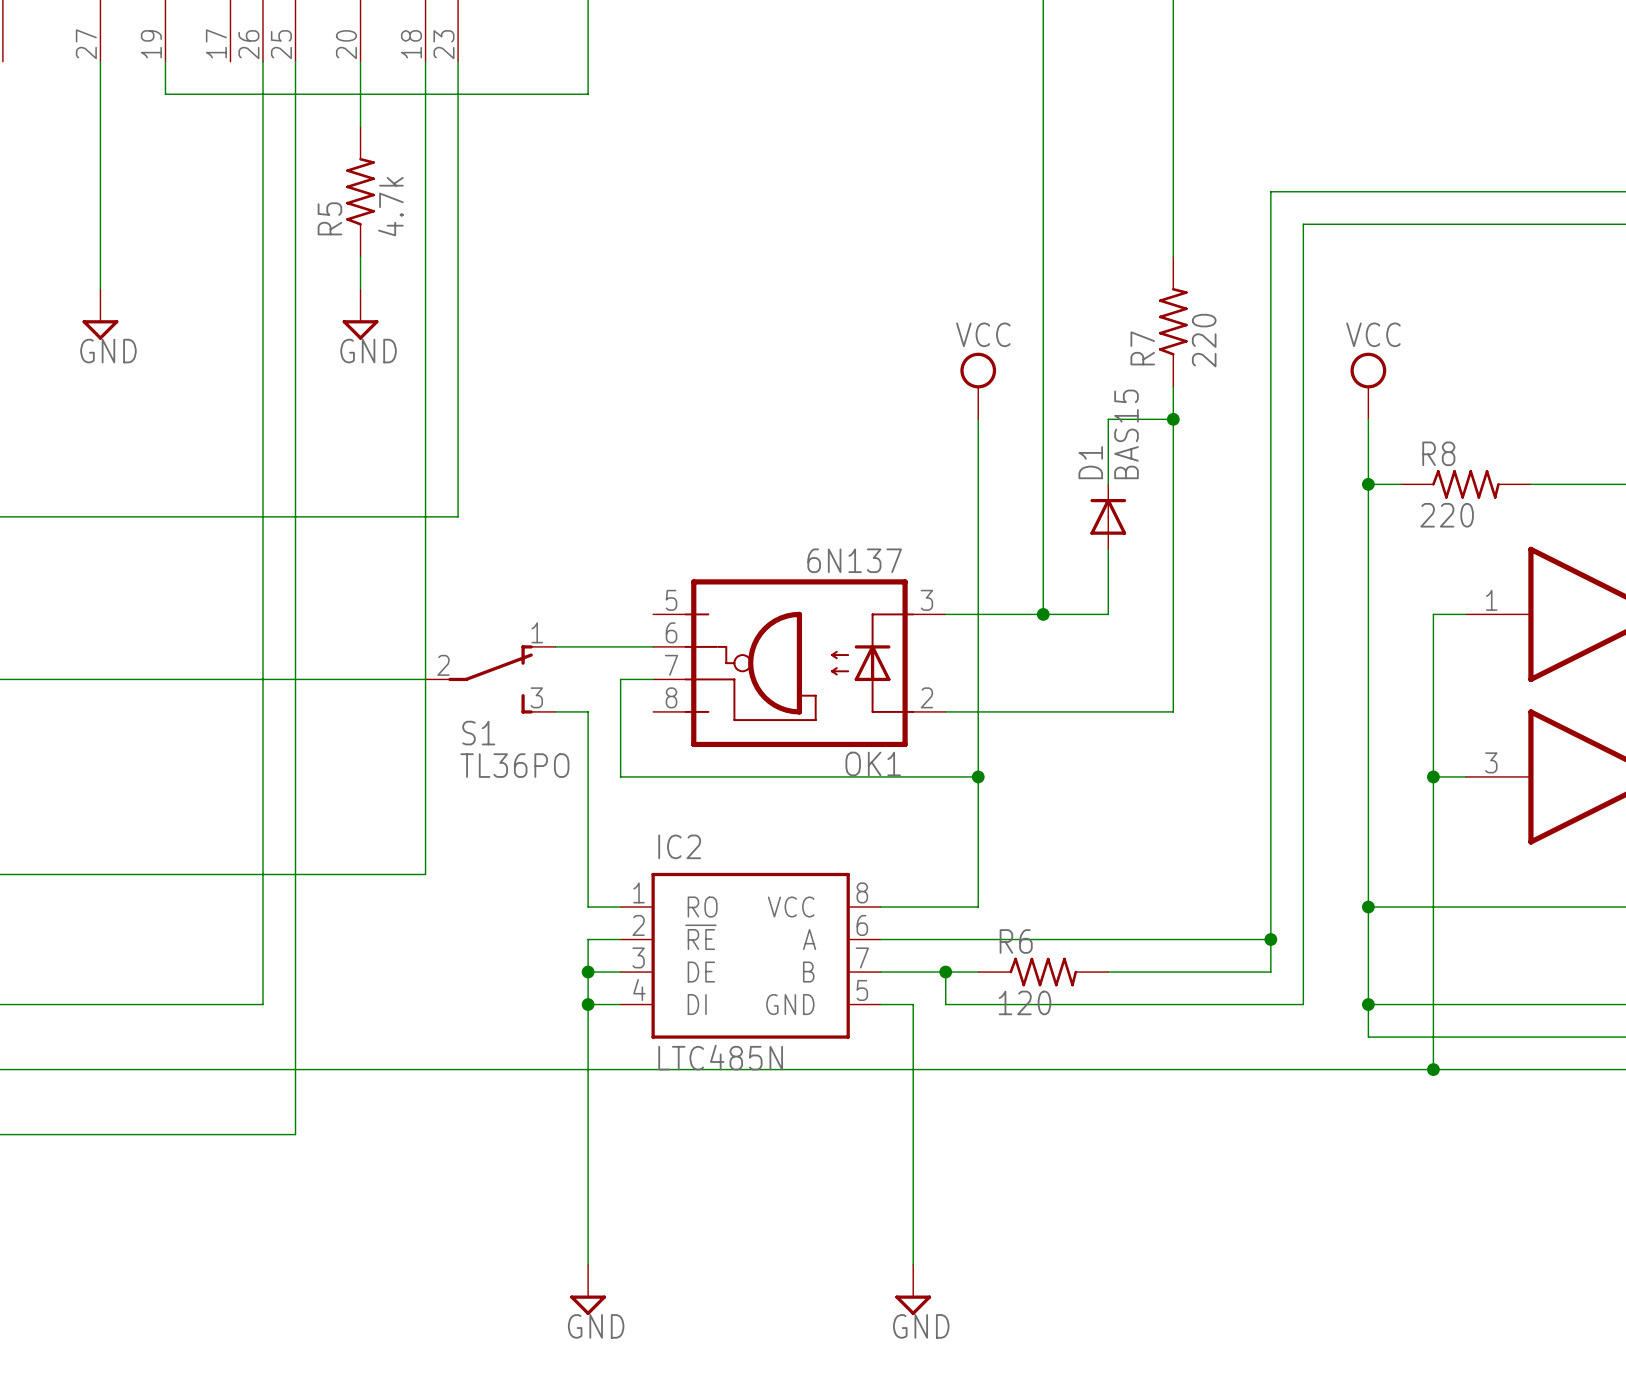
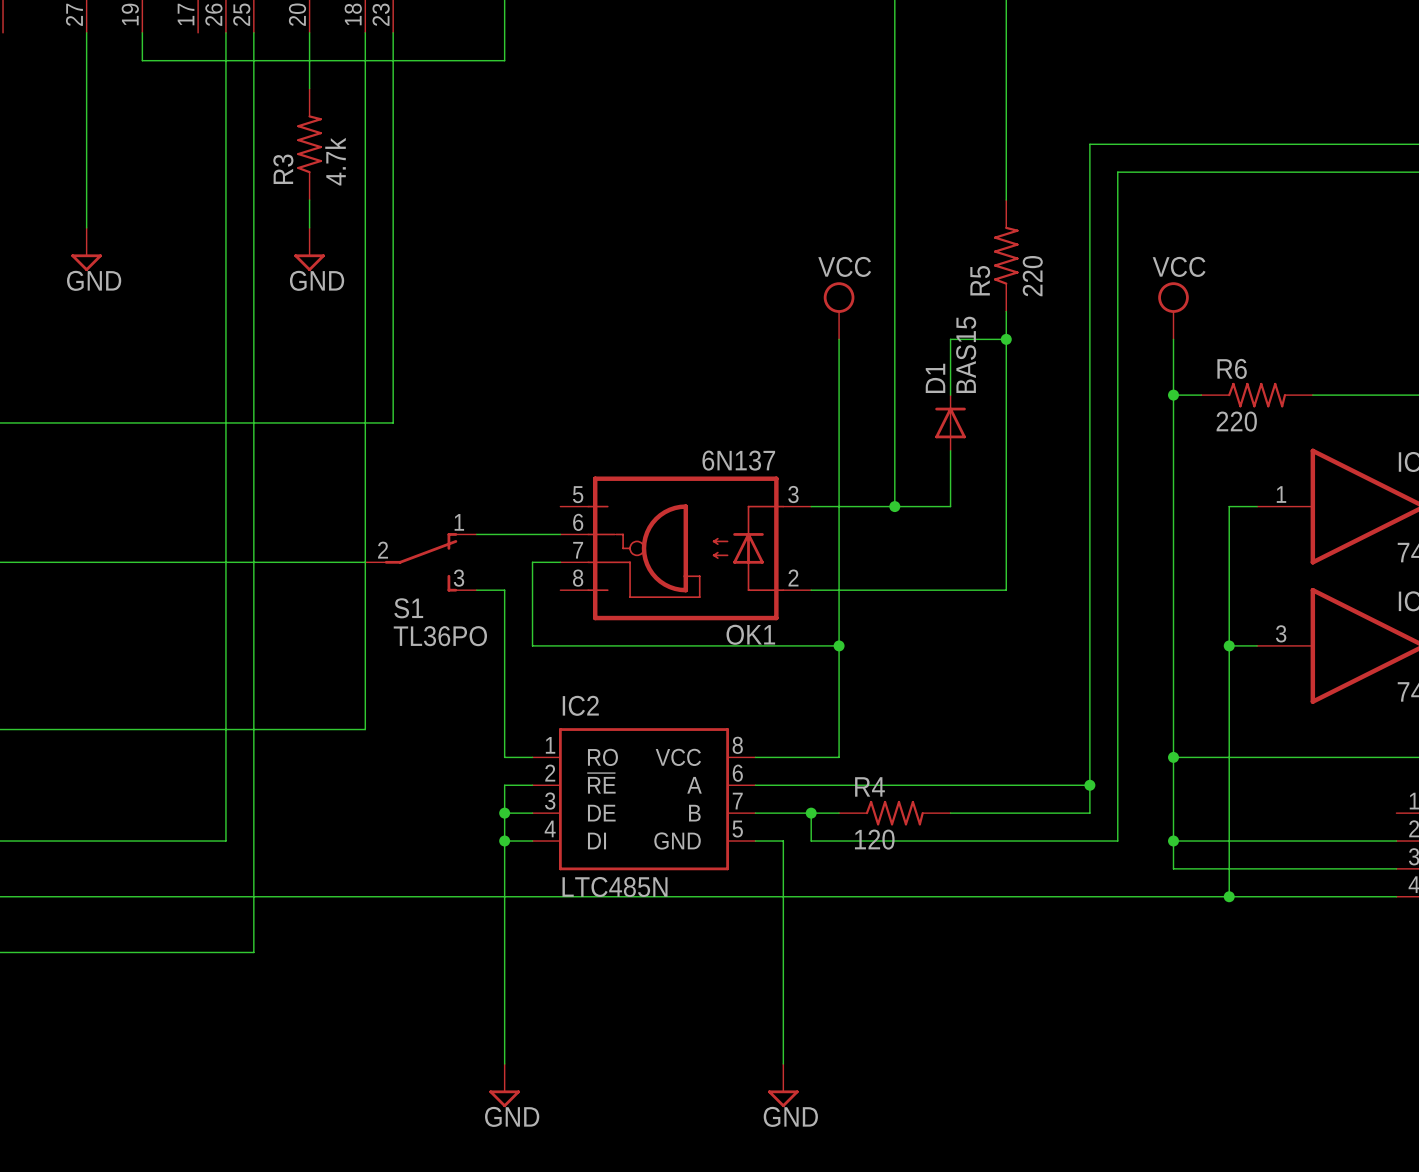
R5 name: R5 (329, 218) -> R3 (283, 169)
R7 name: R7 (1142, 348) -> R5 (980, 280)
R8 name: R8 (1438, 453) -> R6 (1232, 368)
R6 name: R6 (1016, 941) -> R4 (869, 786)

